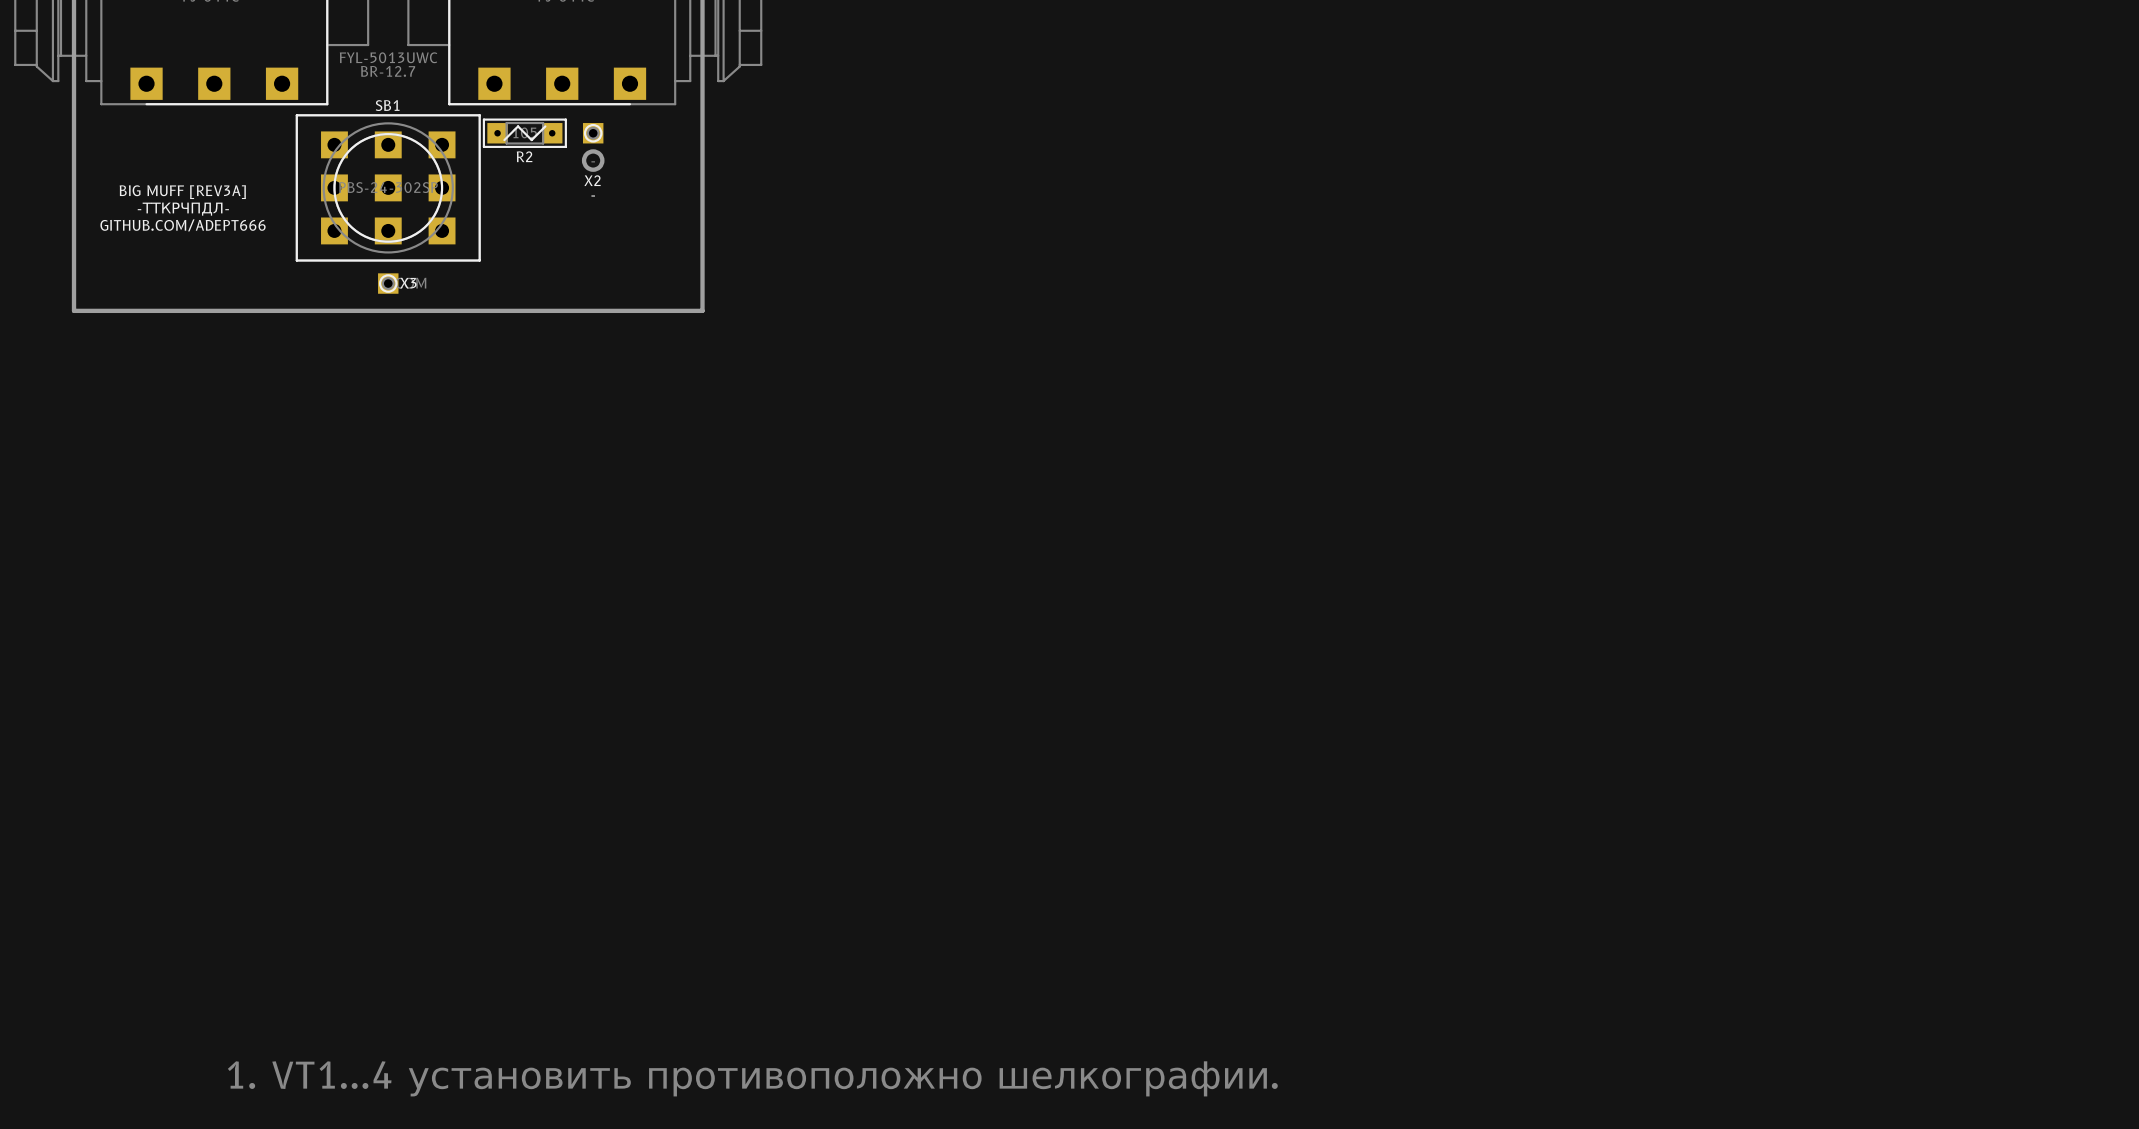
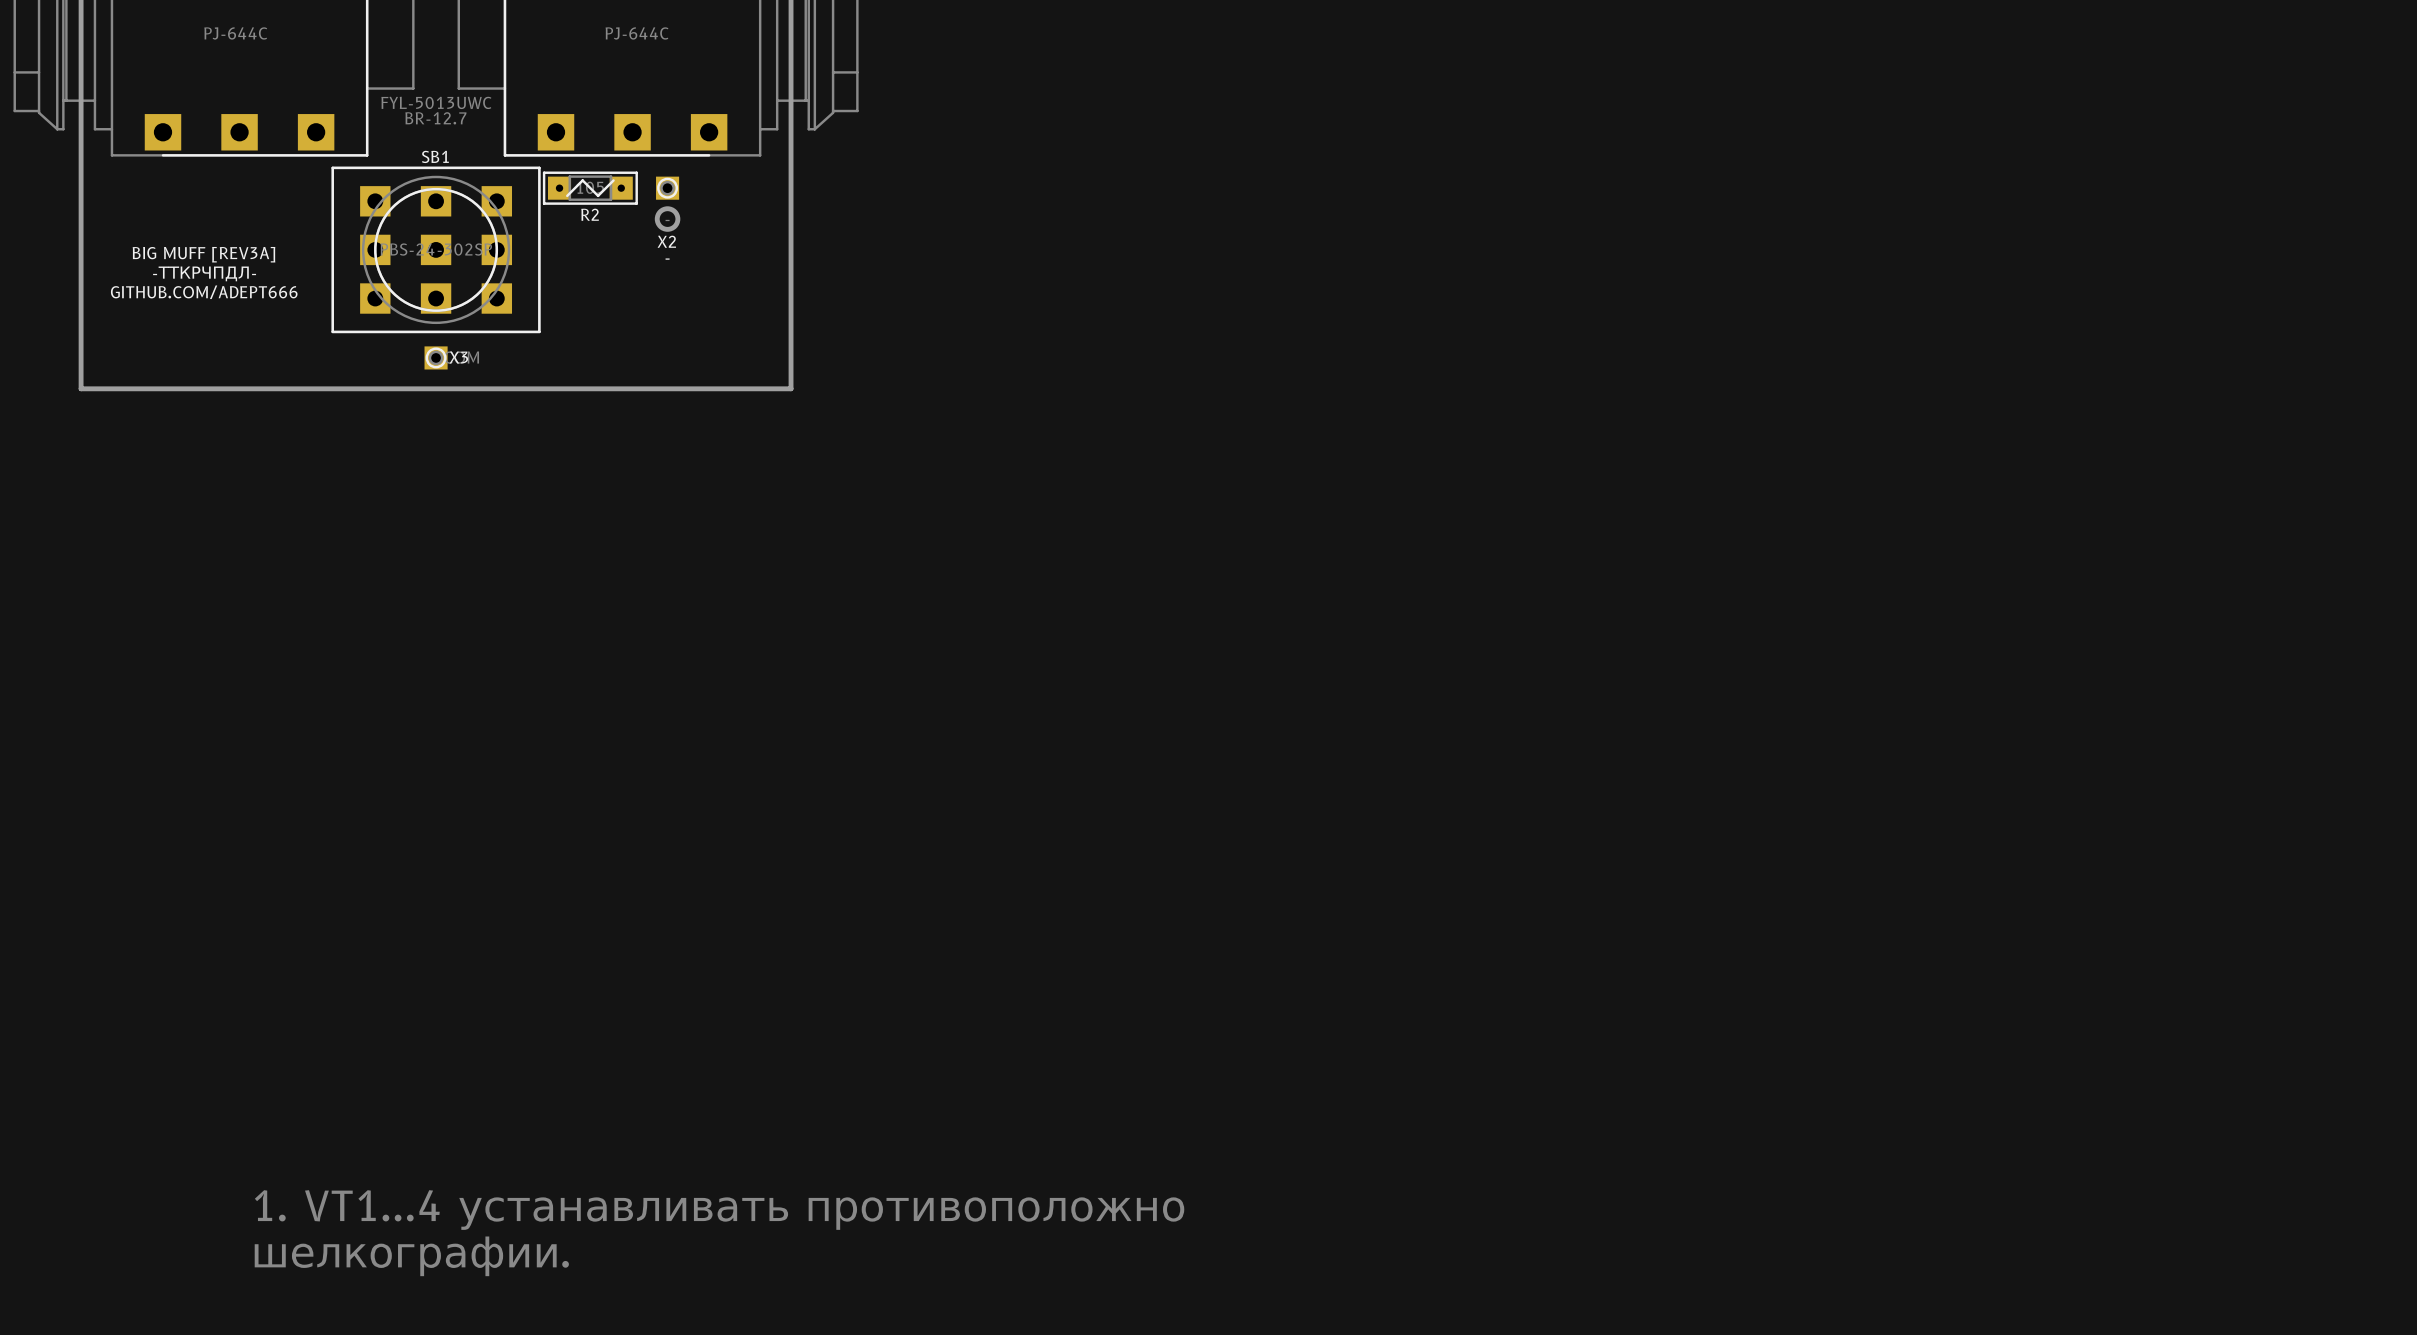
text: none -> 1. VT1...4 устанавливать противоположно (719, 1210)
text: 1. VT1...4 установить противоположно шелкографии. (752, 1078) -> шелкографии. (411, 1256)

